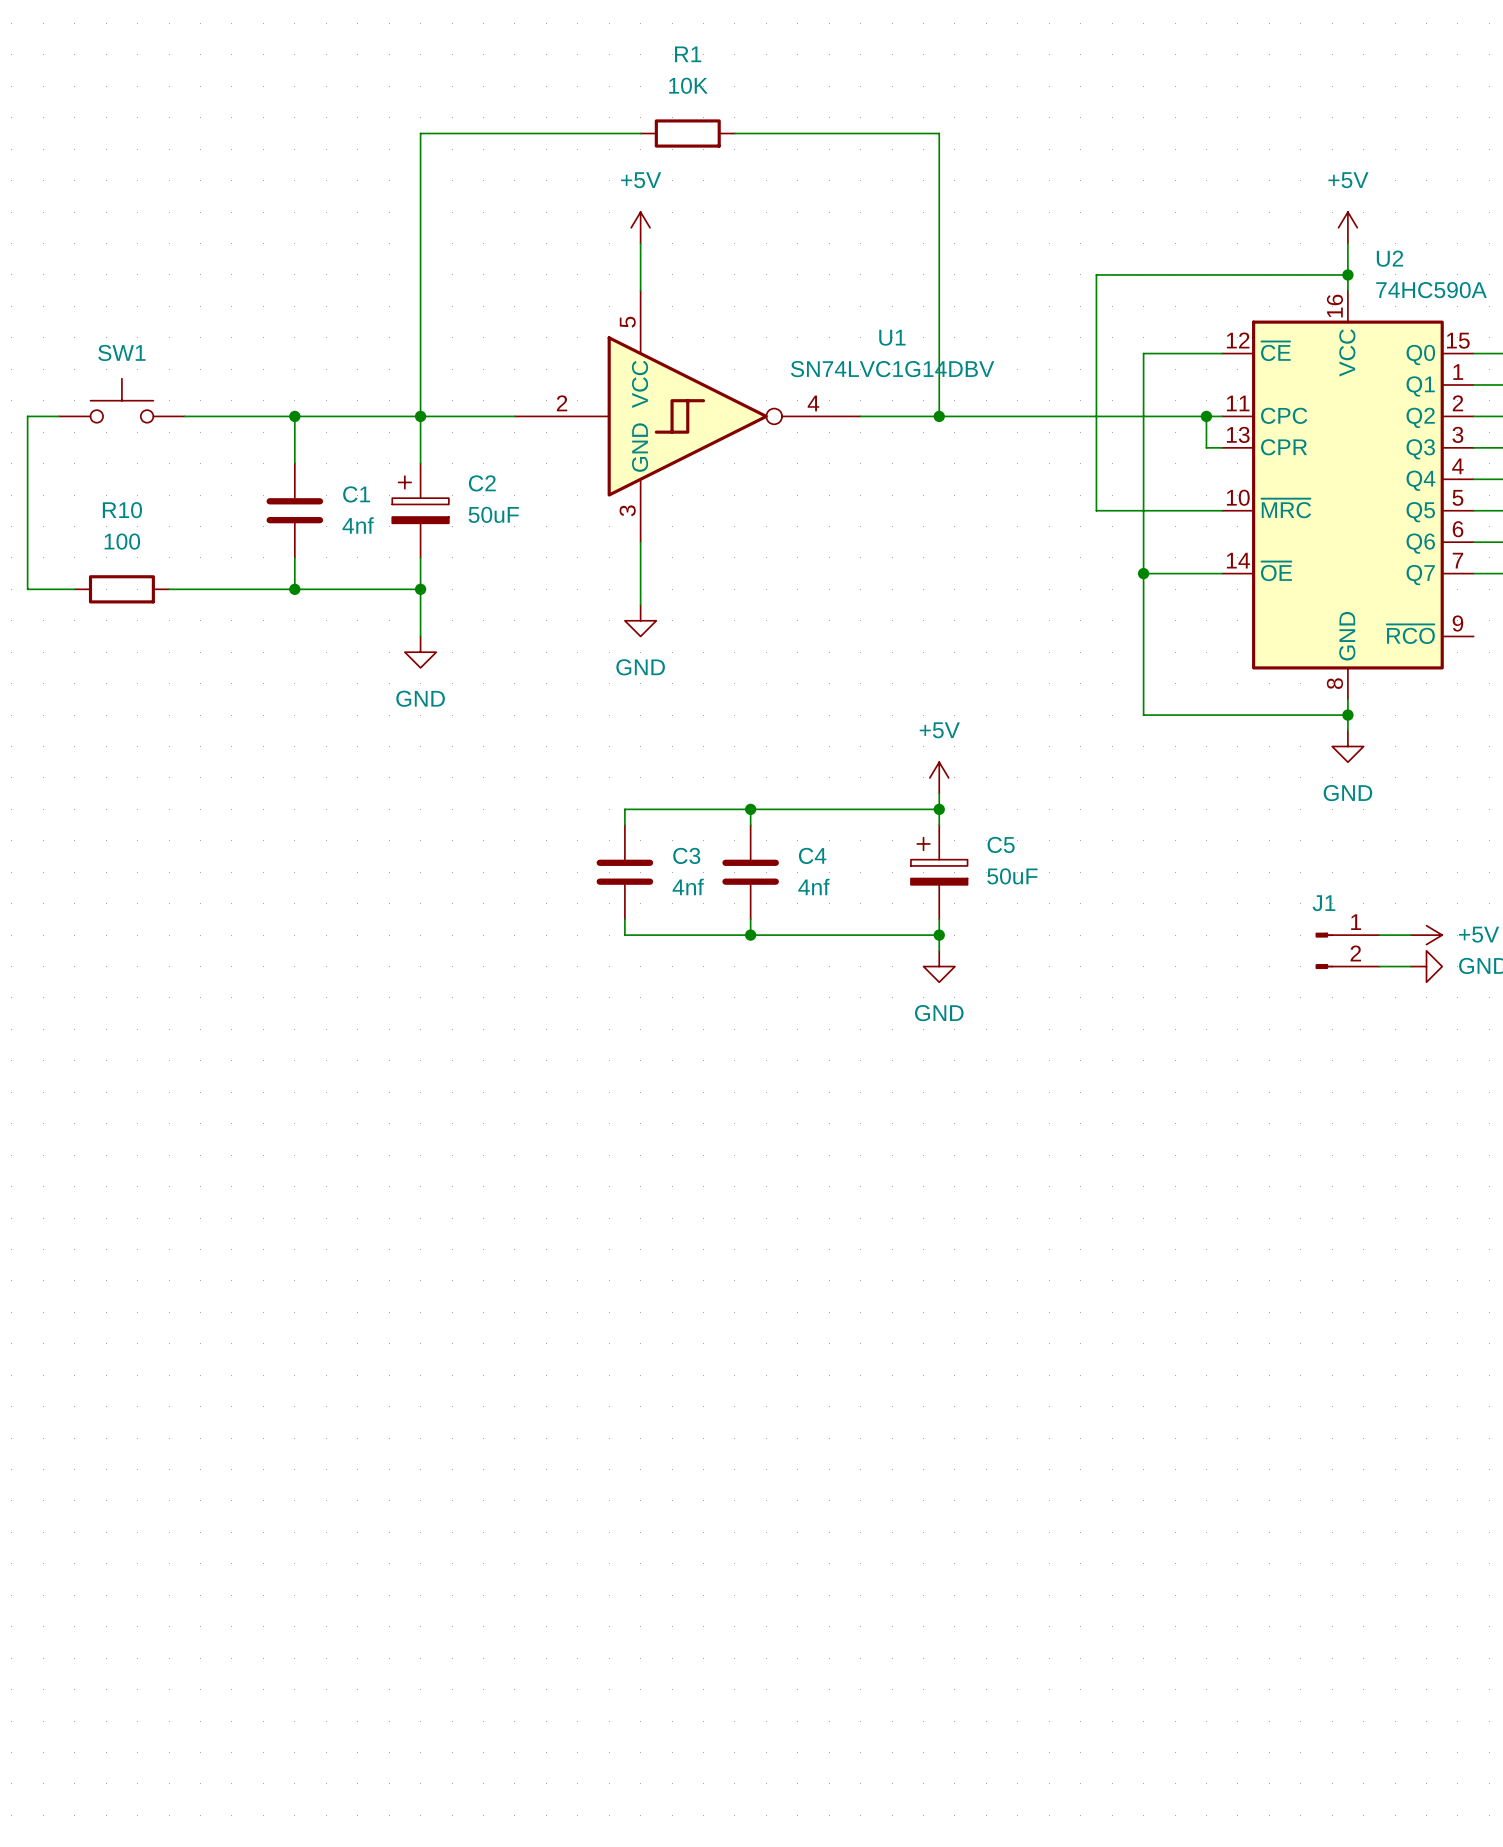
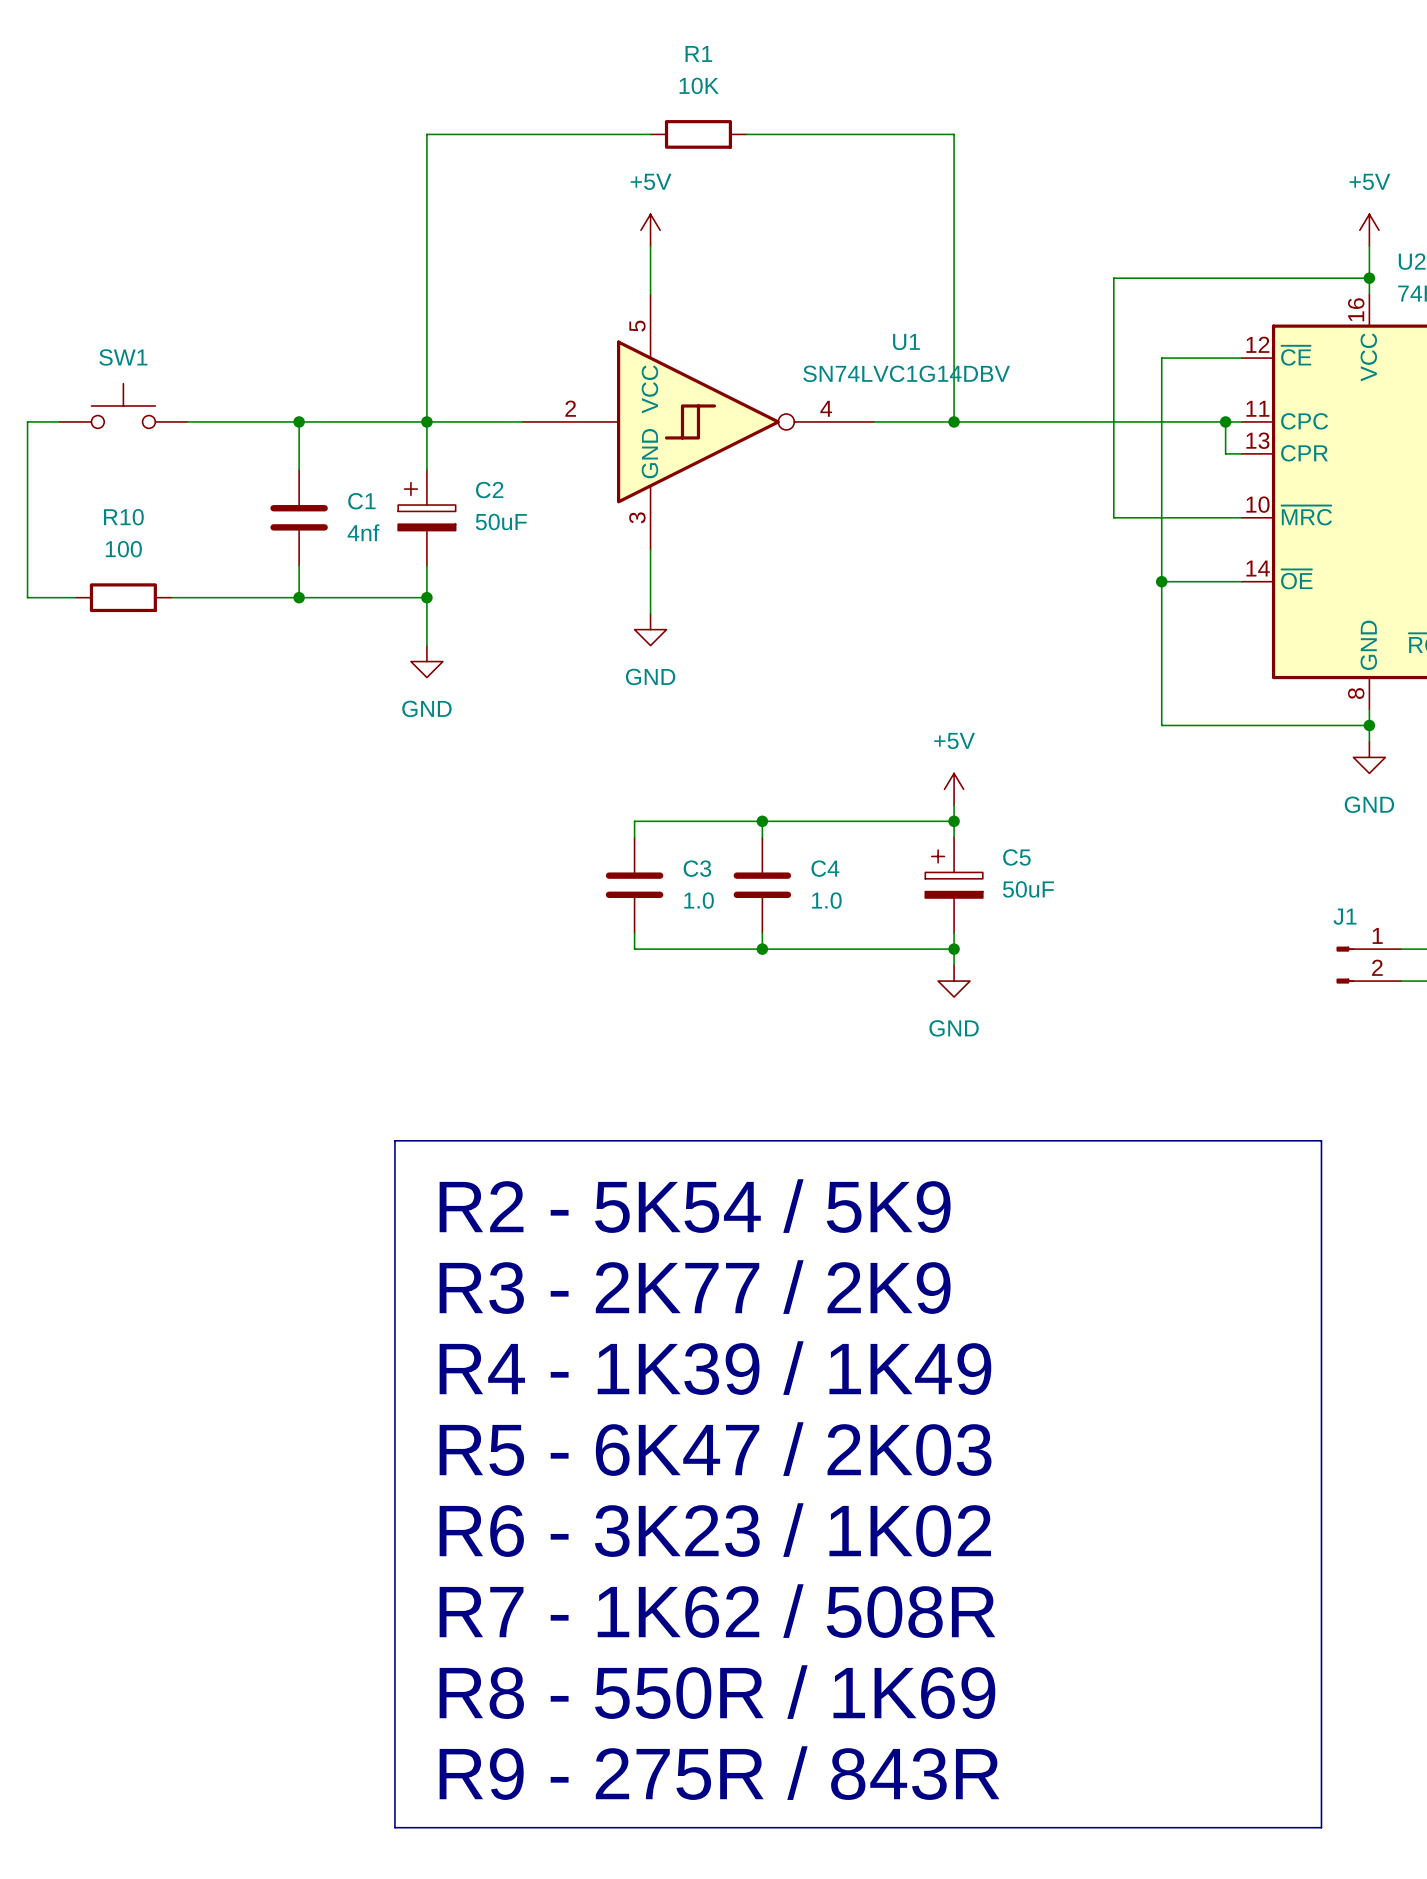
C3 value: 4nf (688, 886) -> 1.0 (699, 900)
C4 value: 4nf (813, 886) -> 1.0 (826, 900)
line: none -> (394, 1140) (1321, 1140) (1321, 1827) (394, 1827) (394, 1140)
text: none -> R2 - 5K54 / 5K9 (695, 1206)
text: none -> R3 - 2K77 / 2K9 (695, 1287)
text: none -> R4 - 1K39 / 1K49 (715, 1368)
text: none -> R5 - 6K47 / 2K03 (715, 1449)
text: none -> R6 - 3K23 / 1K02 (715, 1530)
text: none -> R7 - 1K62 / 508R (717, 1611)
text: none -> R8 - 550R / 1K69 (717, 1692)
text: none -> R9 - 275R / 843R (719, 1773)

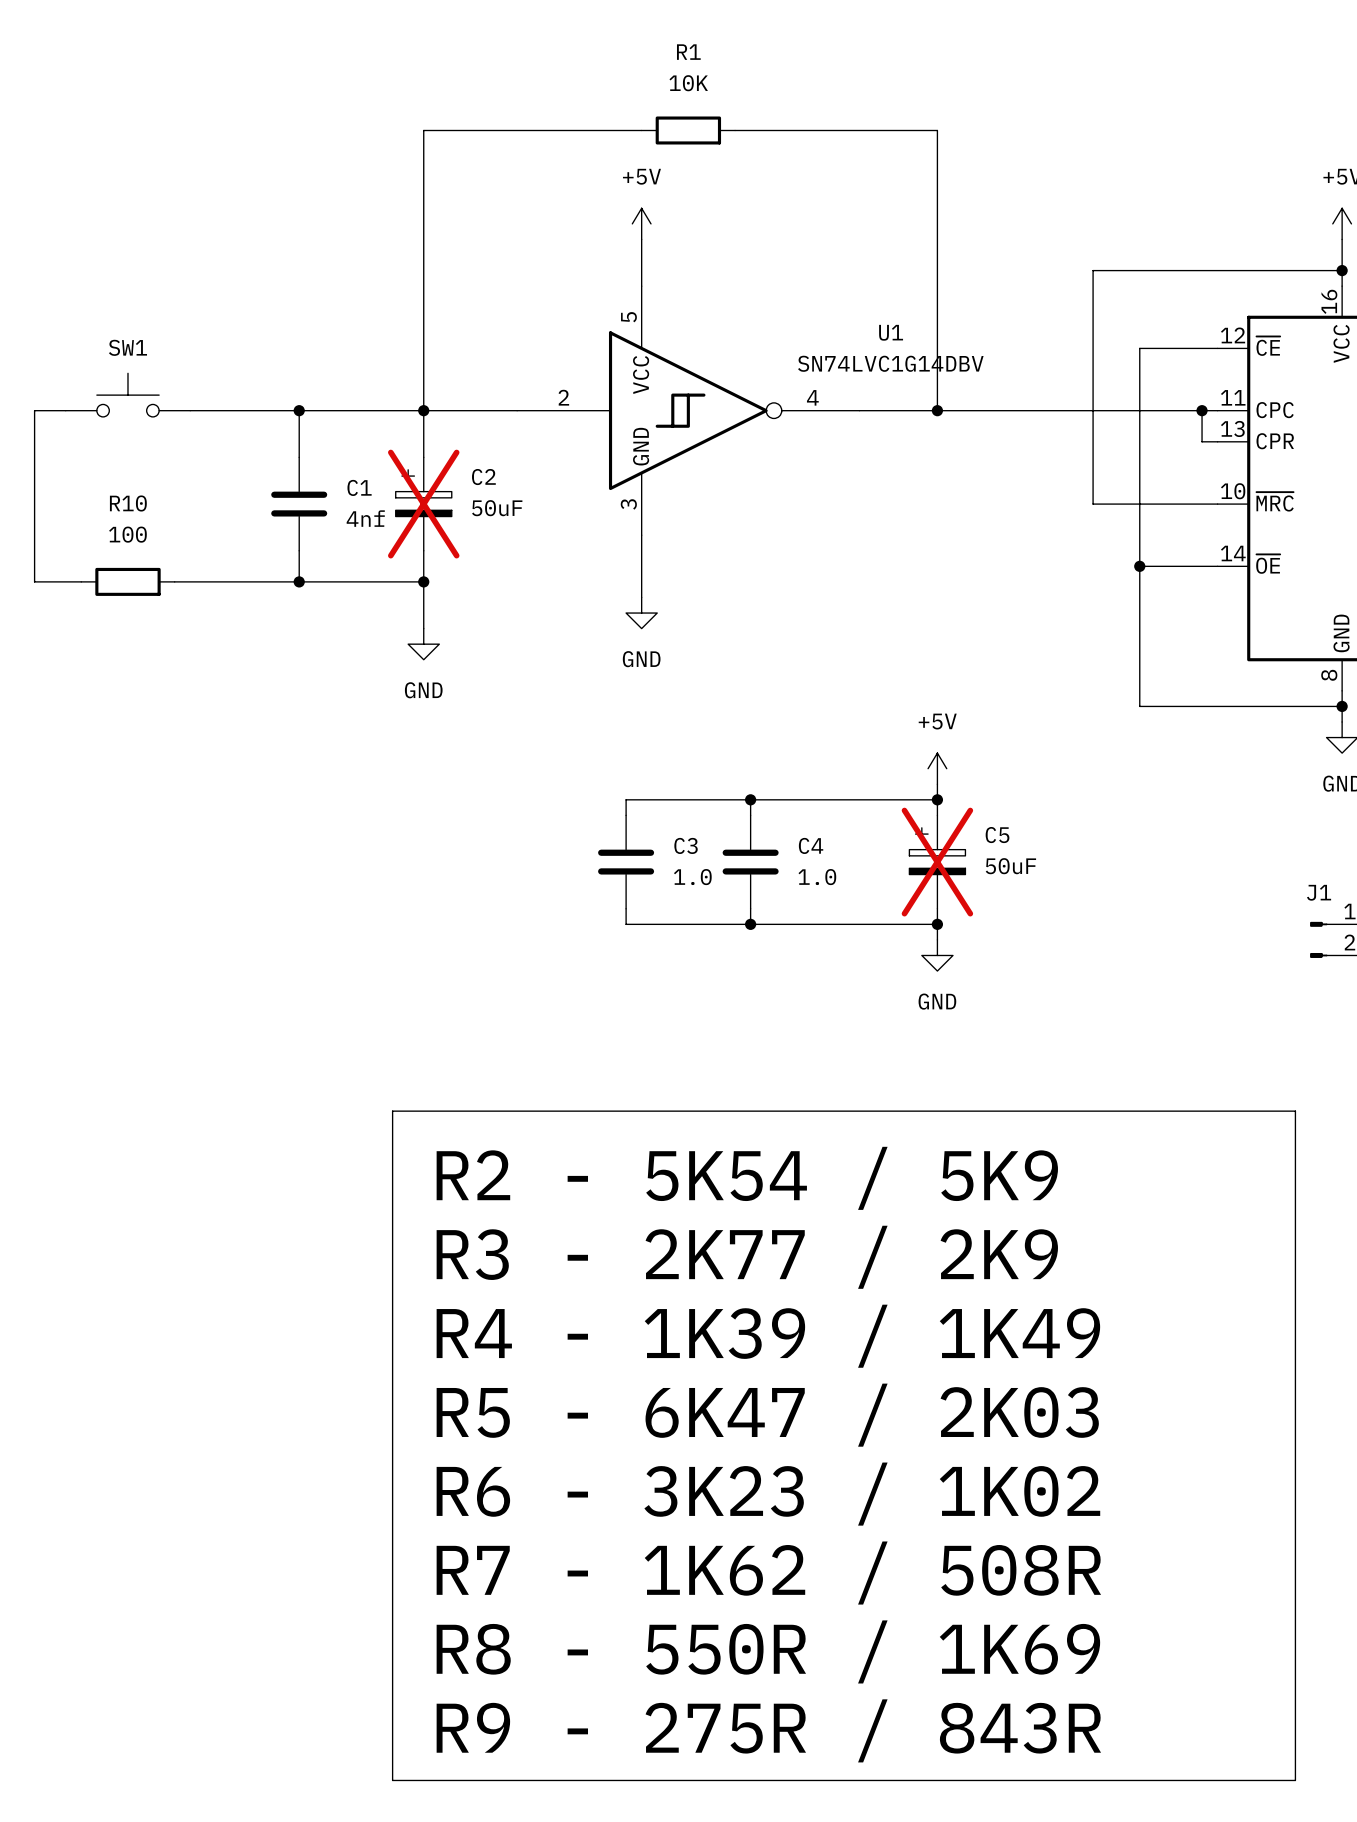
C2 do-not-place cross: none -> (423, 504)
C5 do-not-place cross: none -> (937, 862)

